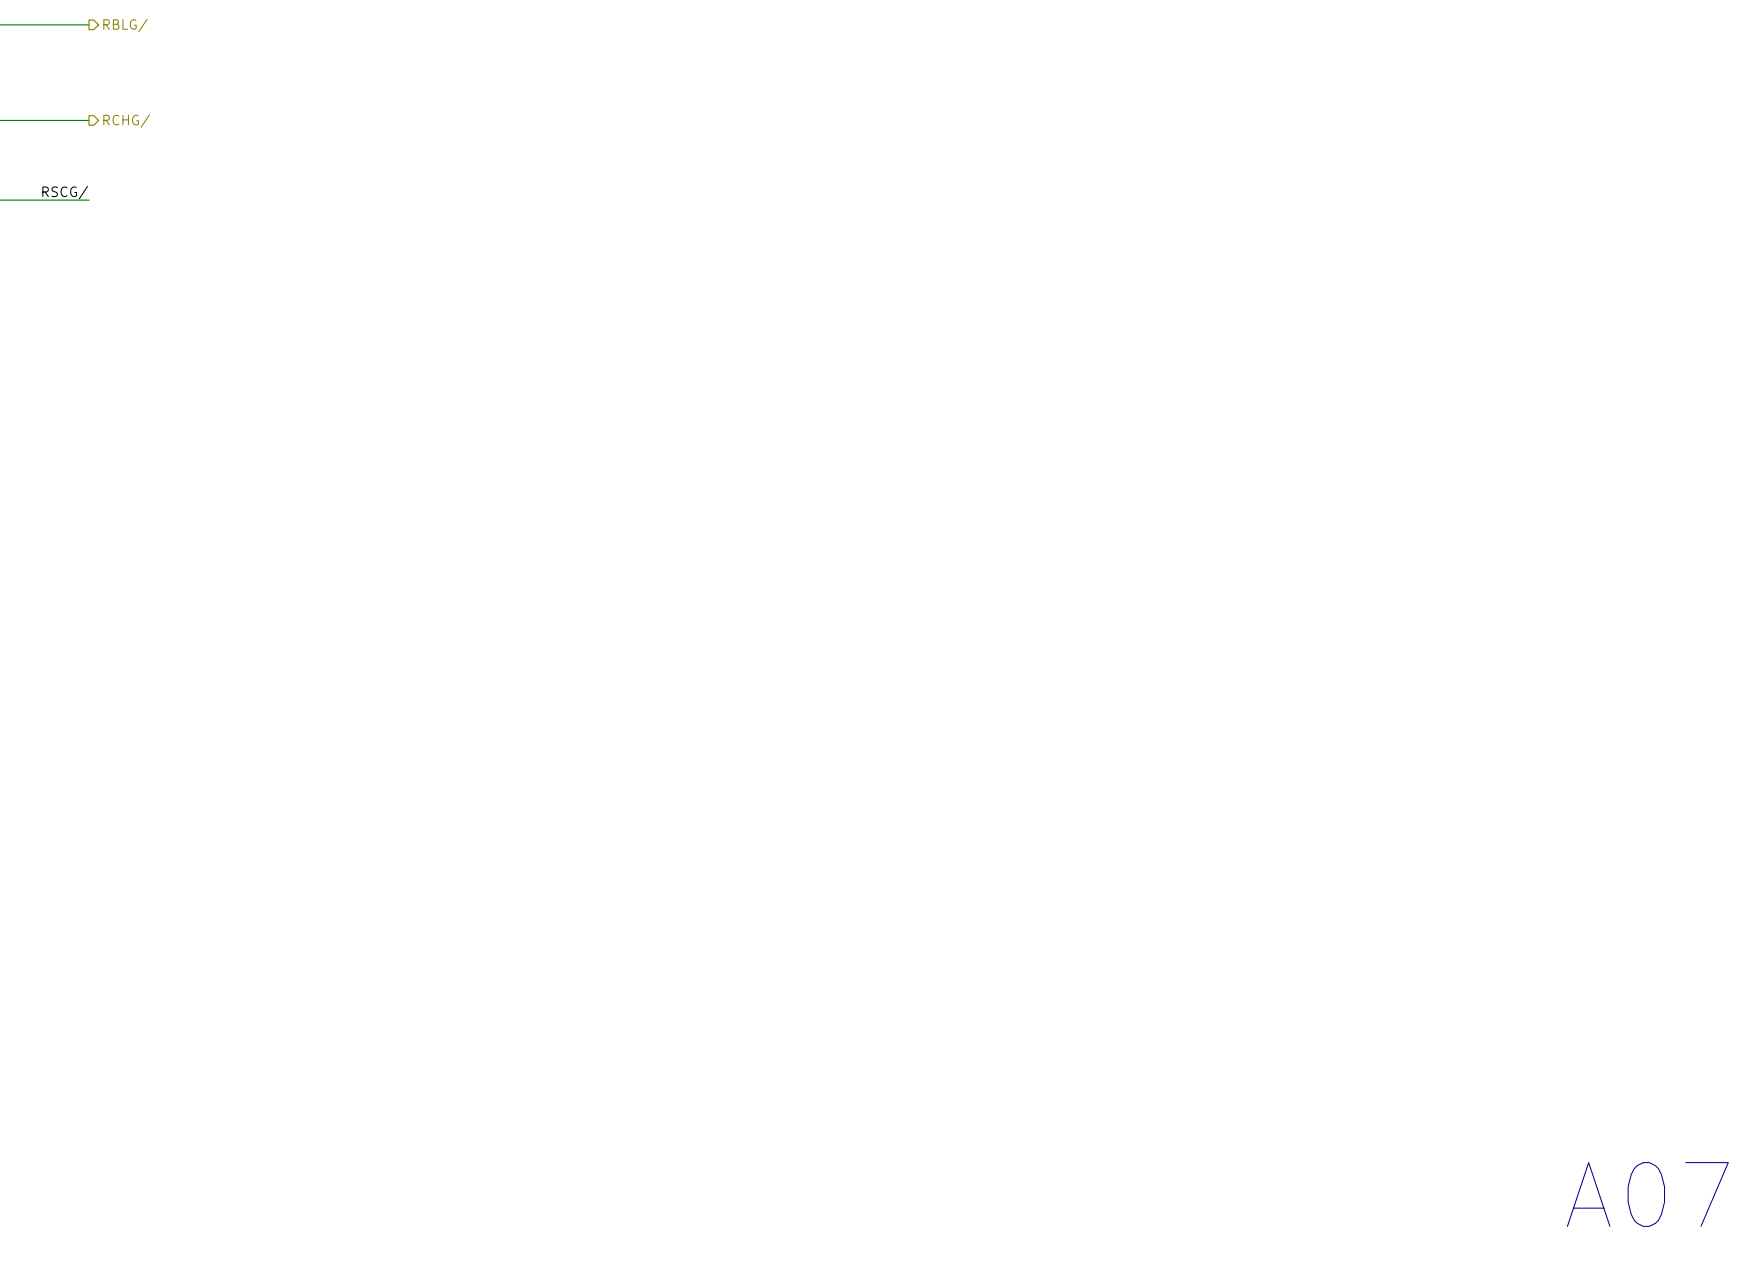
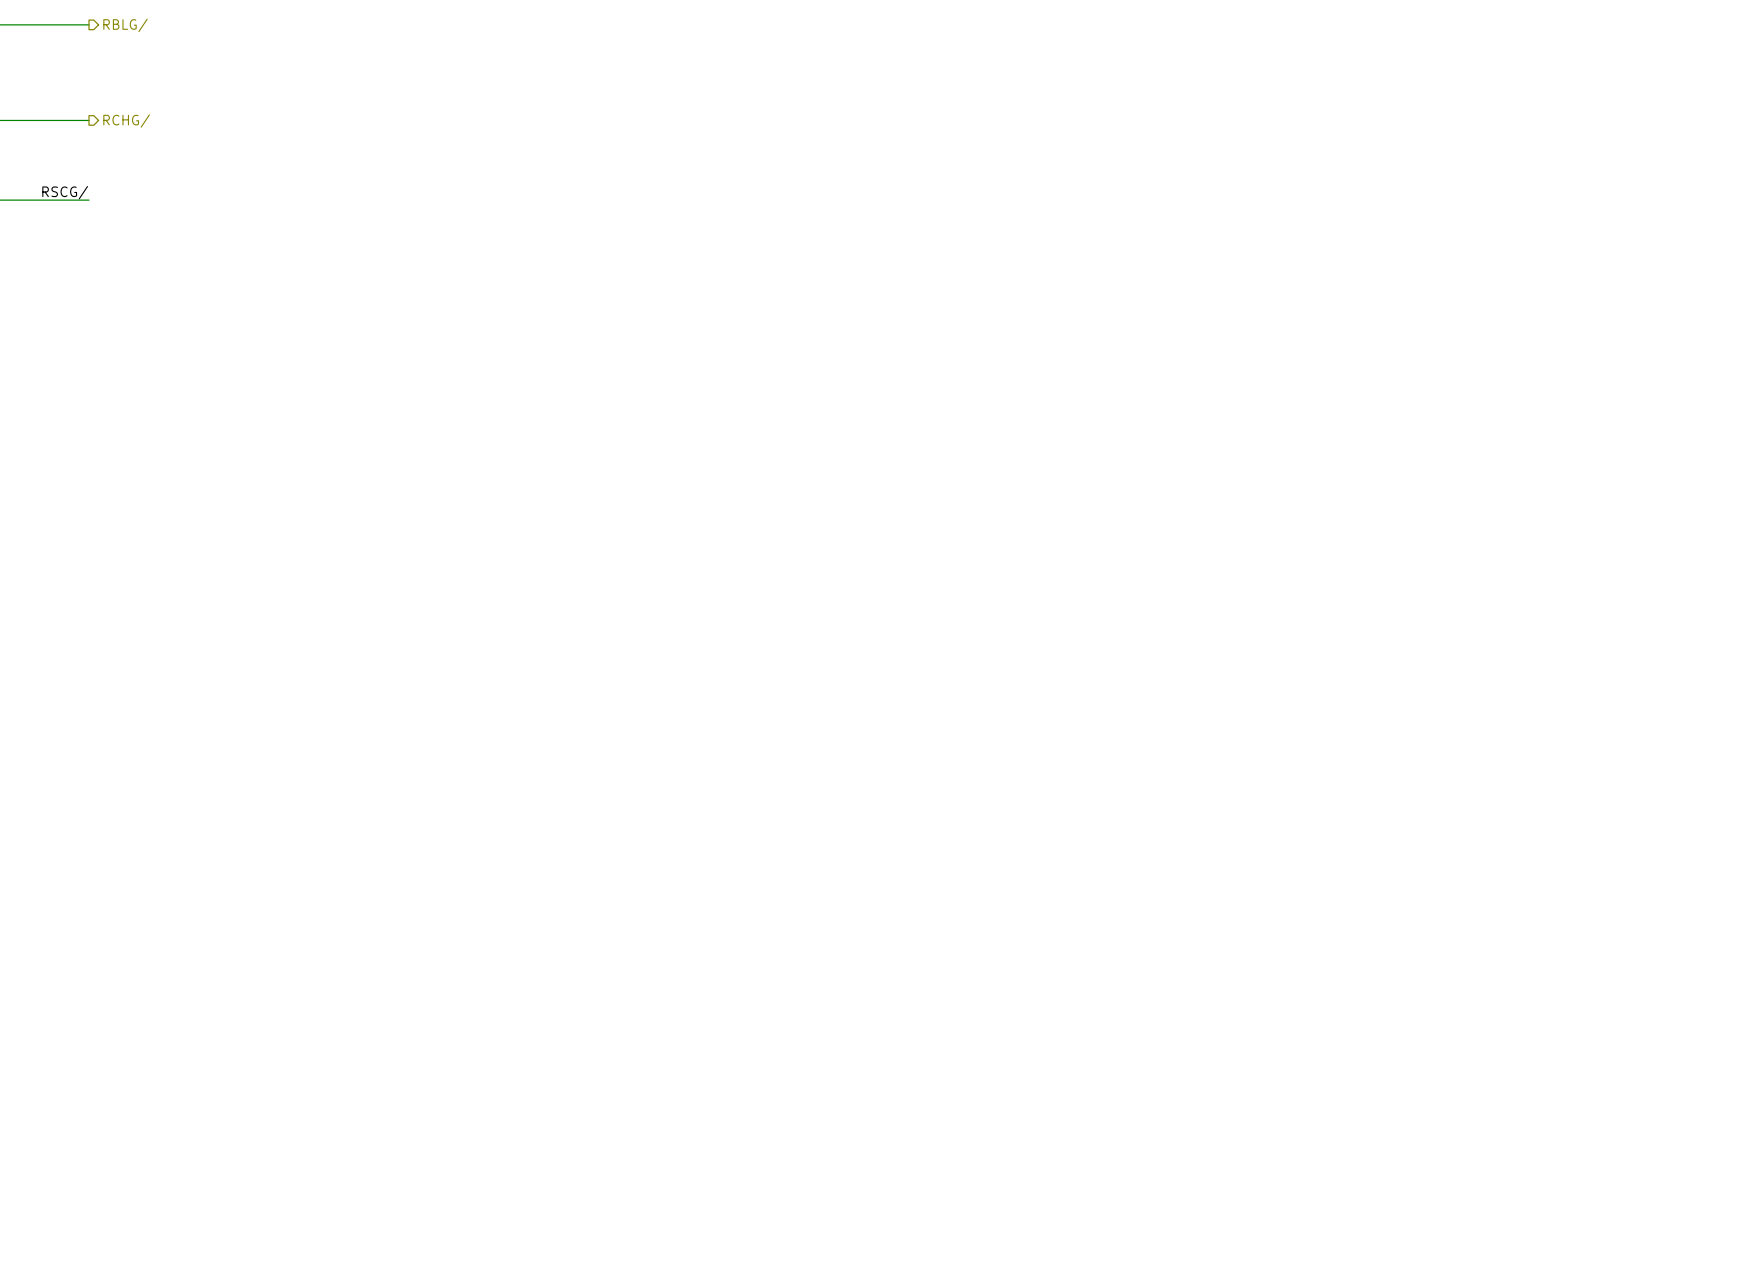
text: A07 (1647, 1194) -> none

